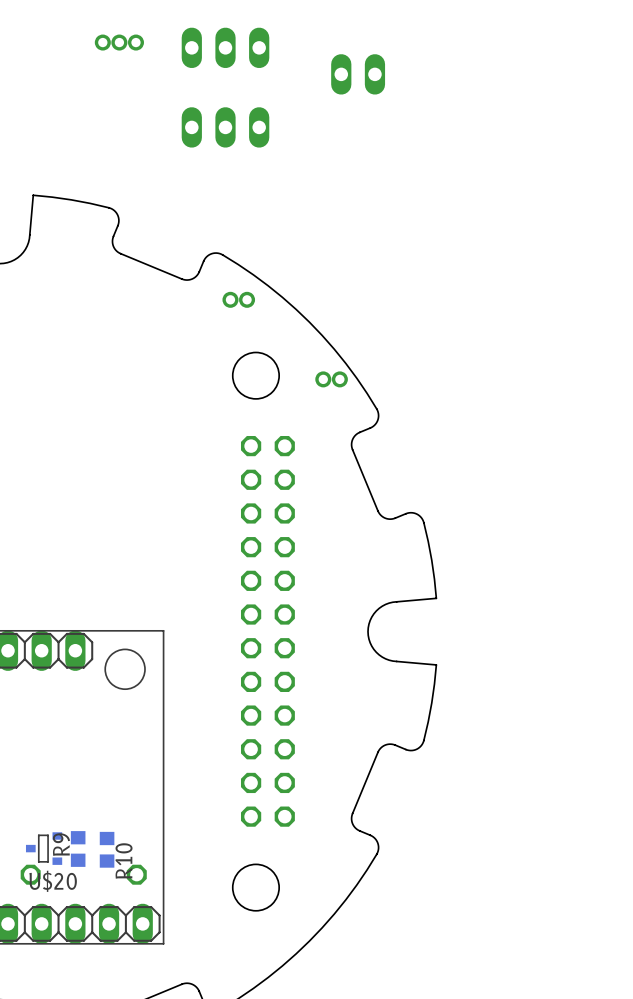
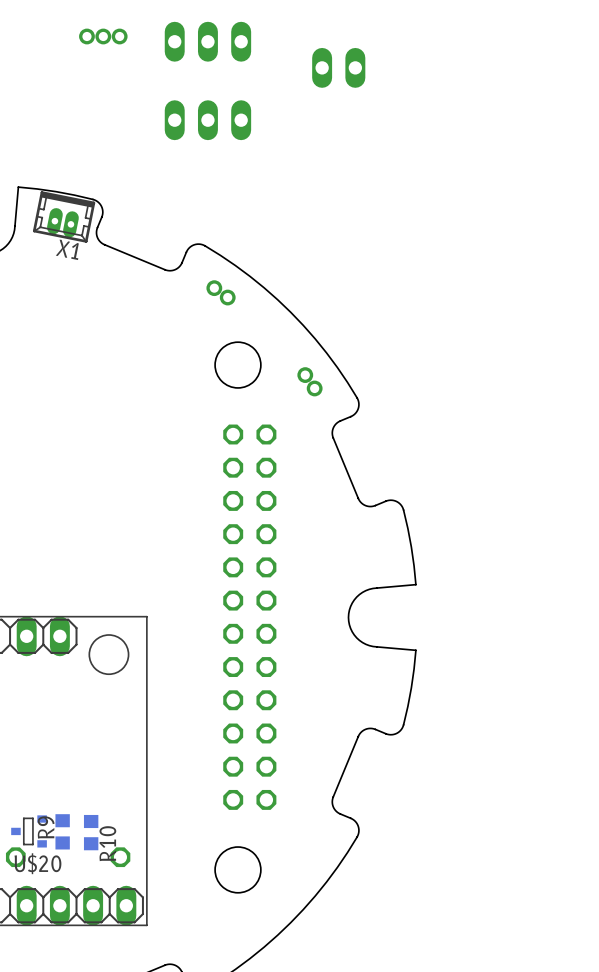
X1: none -> (64, 216)
part rotation: 0° (238, 299) -> 35° clockwise (221, 292)
part: (331, 379) -> none
part: none -> (309, 381)

